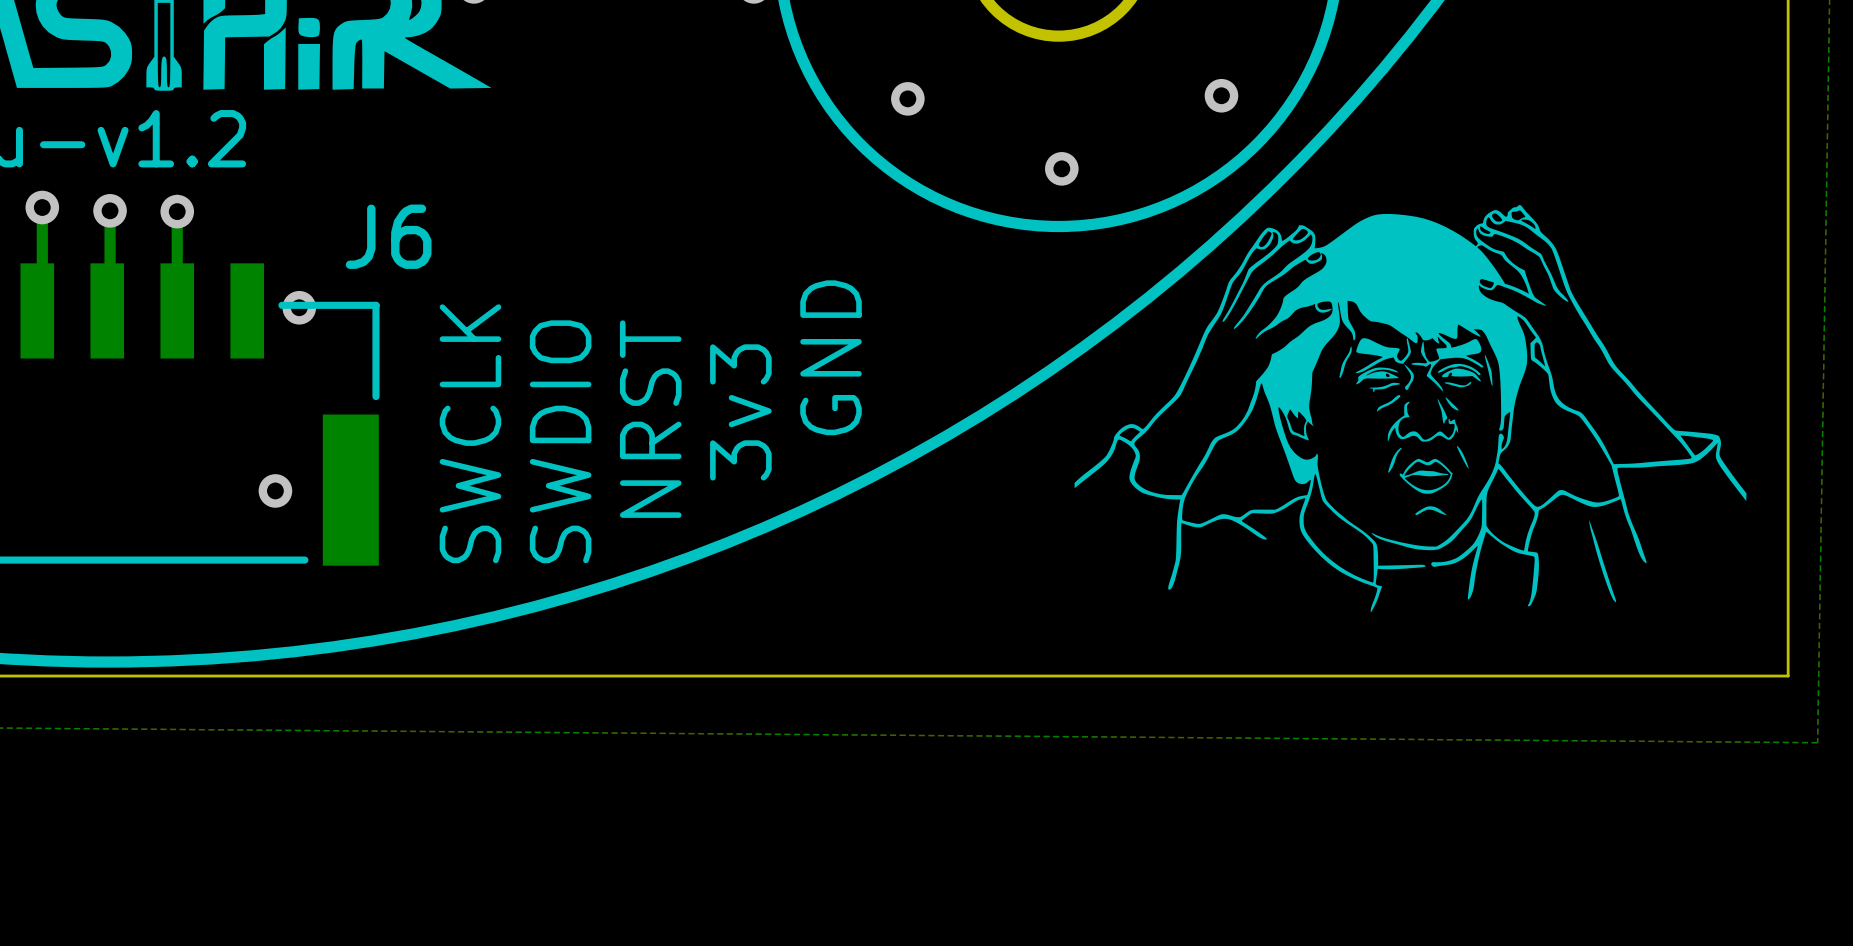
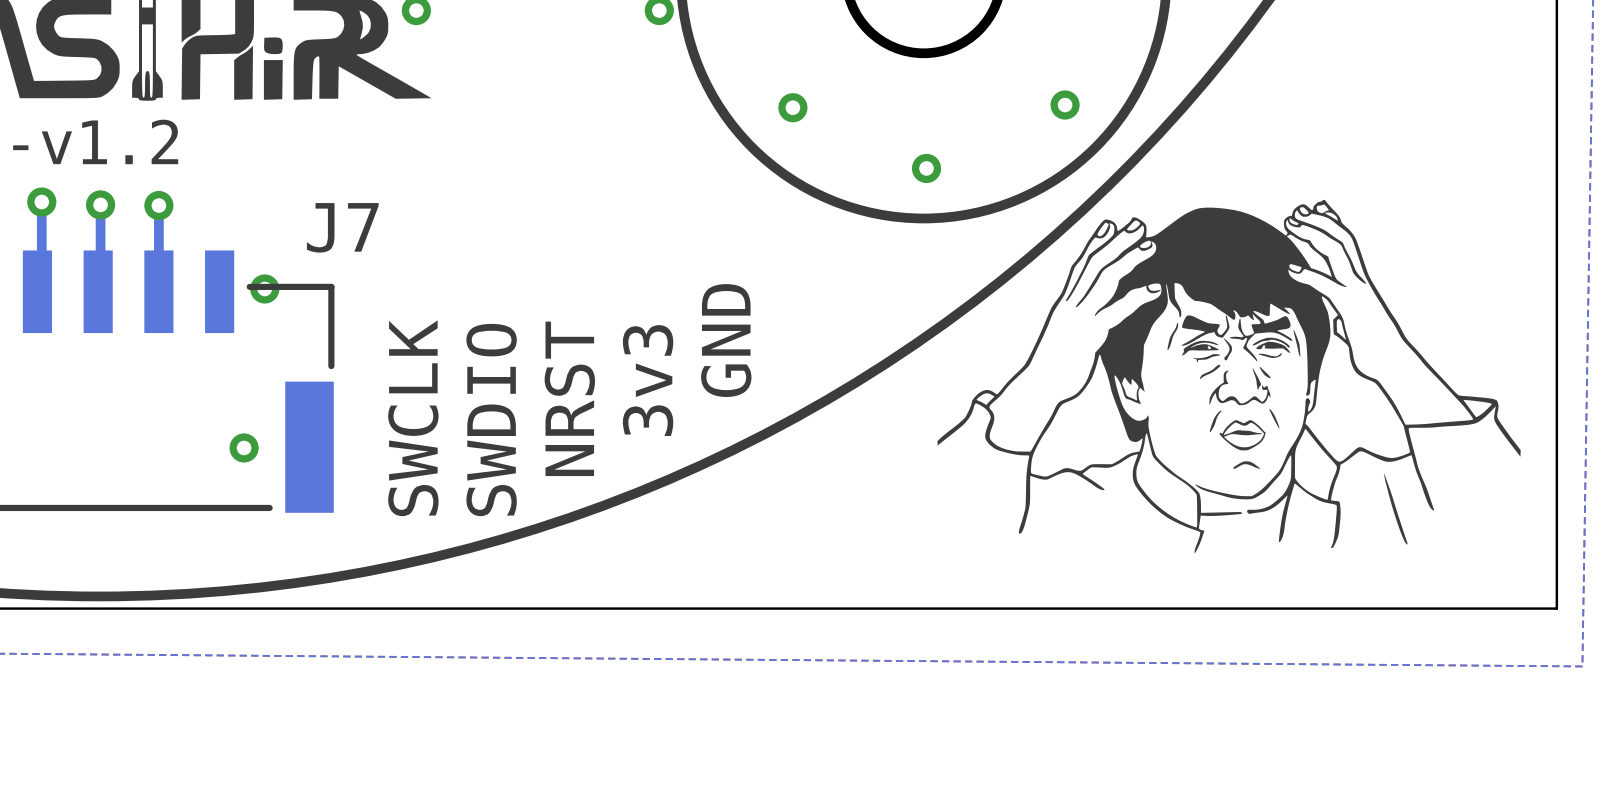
J6 name: J6 (388, 236) -> J7 (342, 227)

